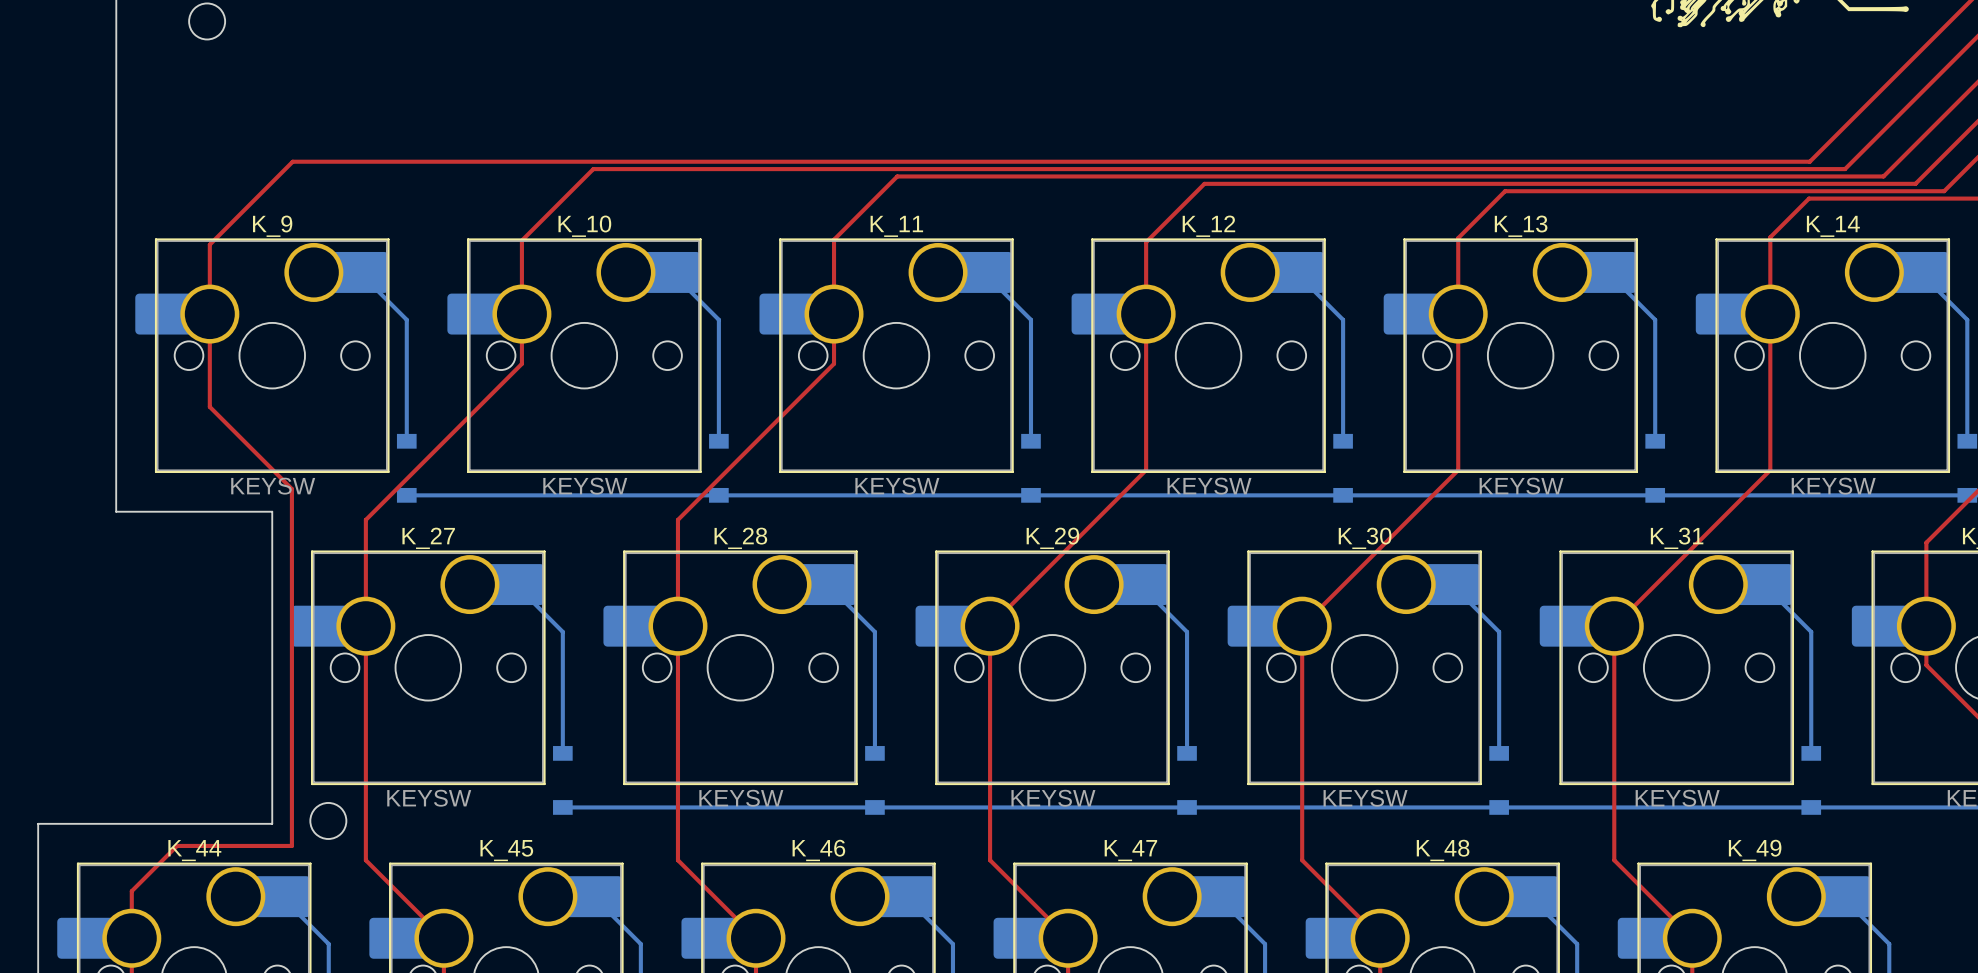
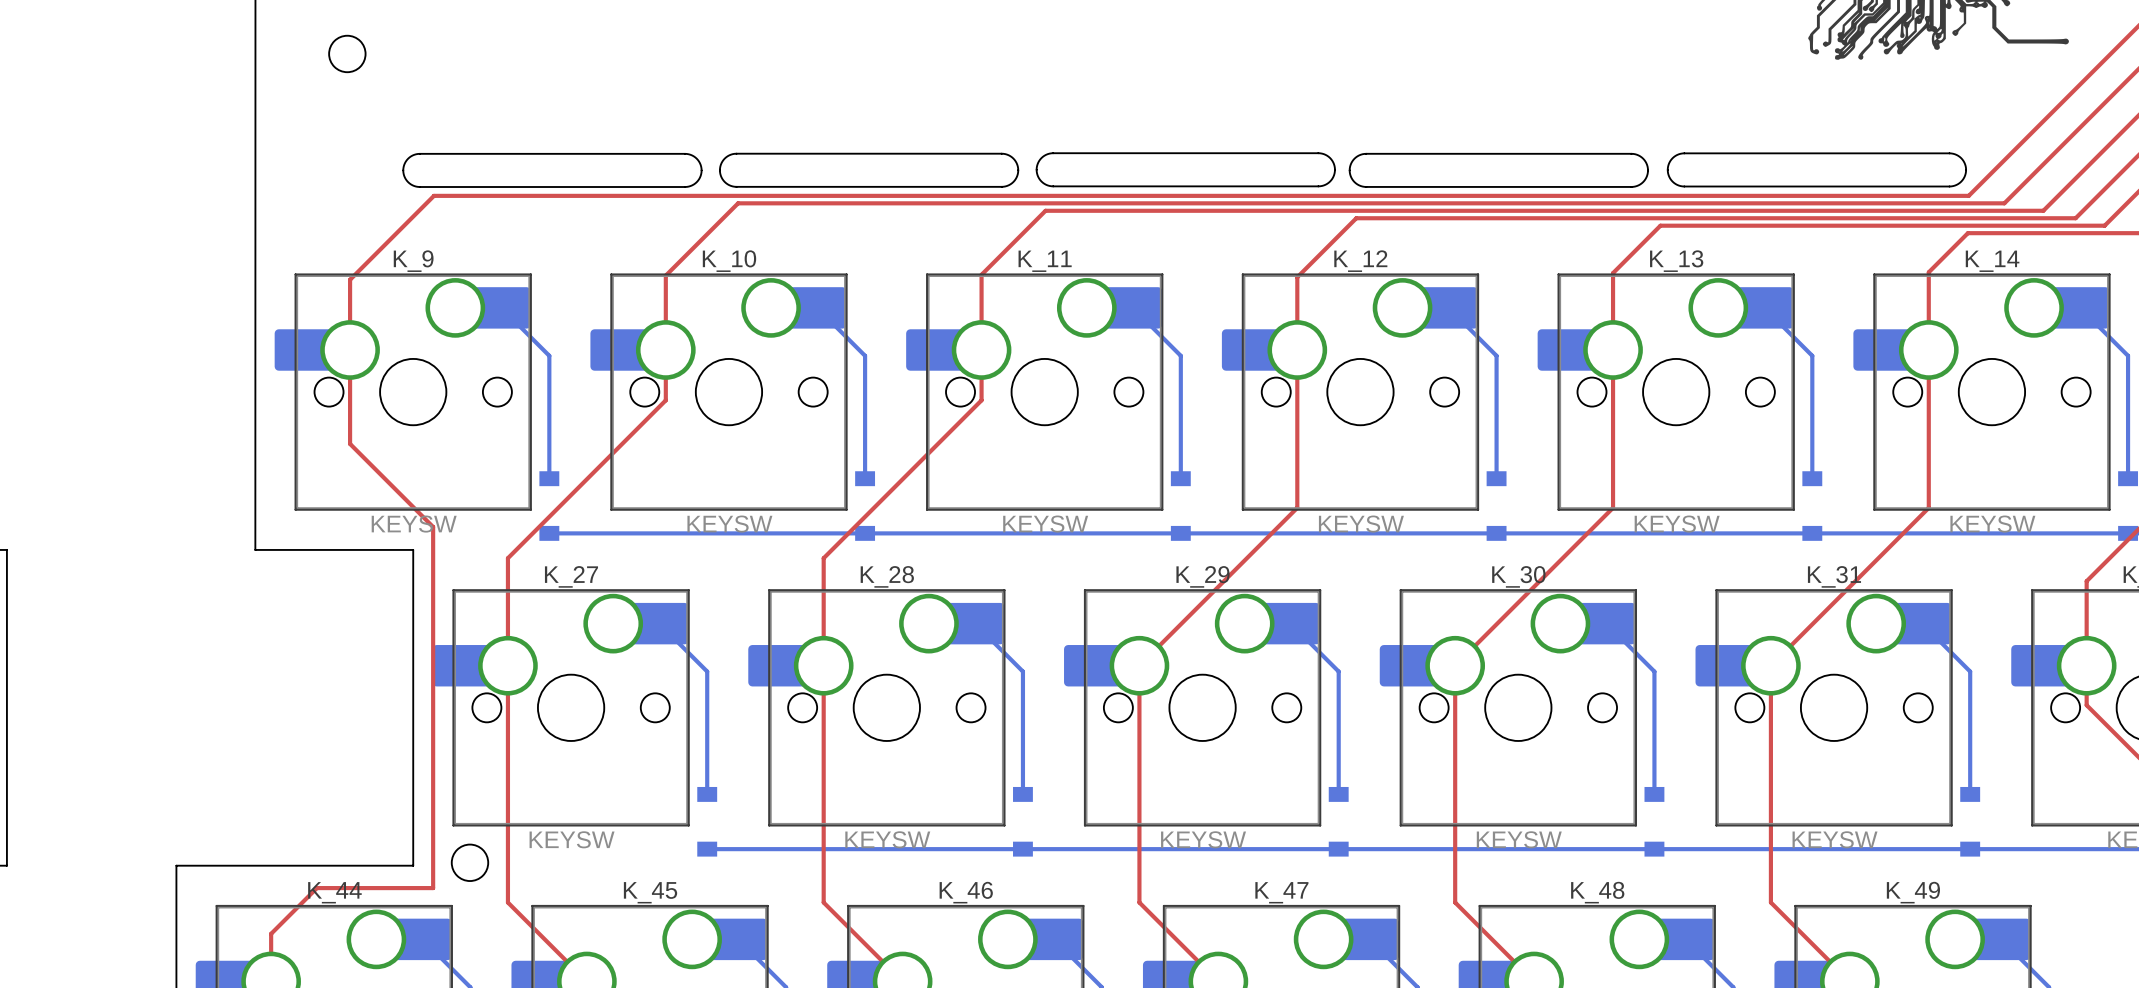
drawing: none -> [402, 152, 1967, 188]

